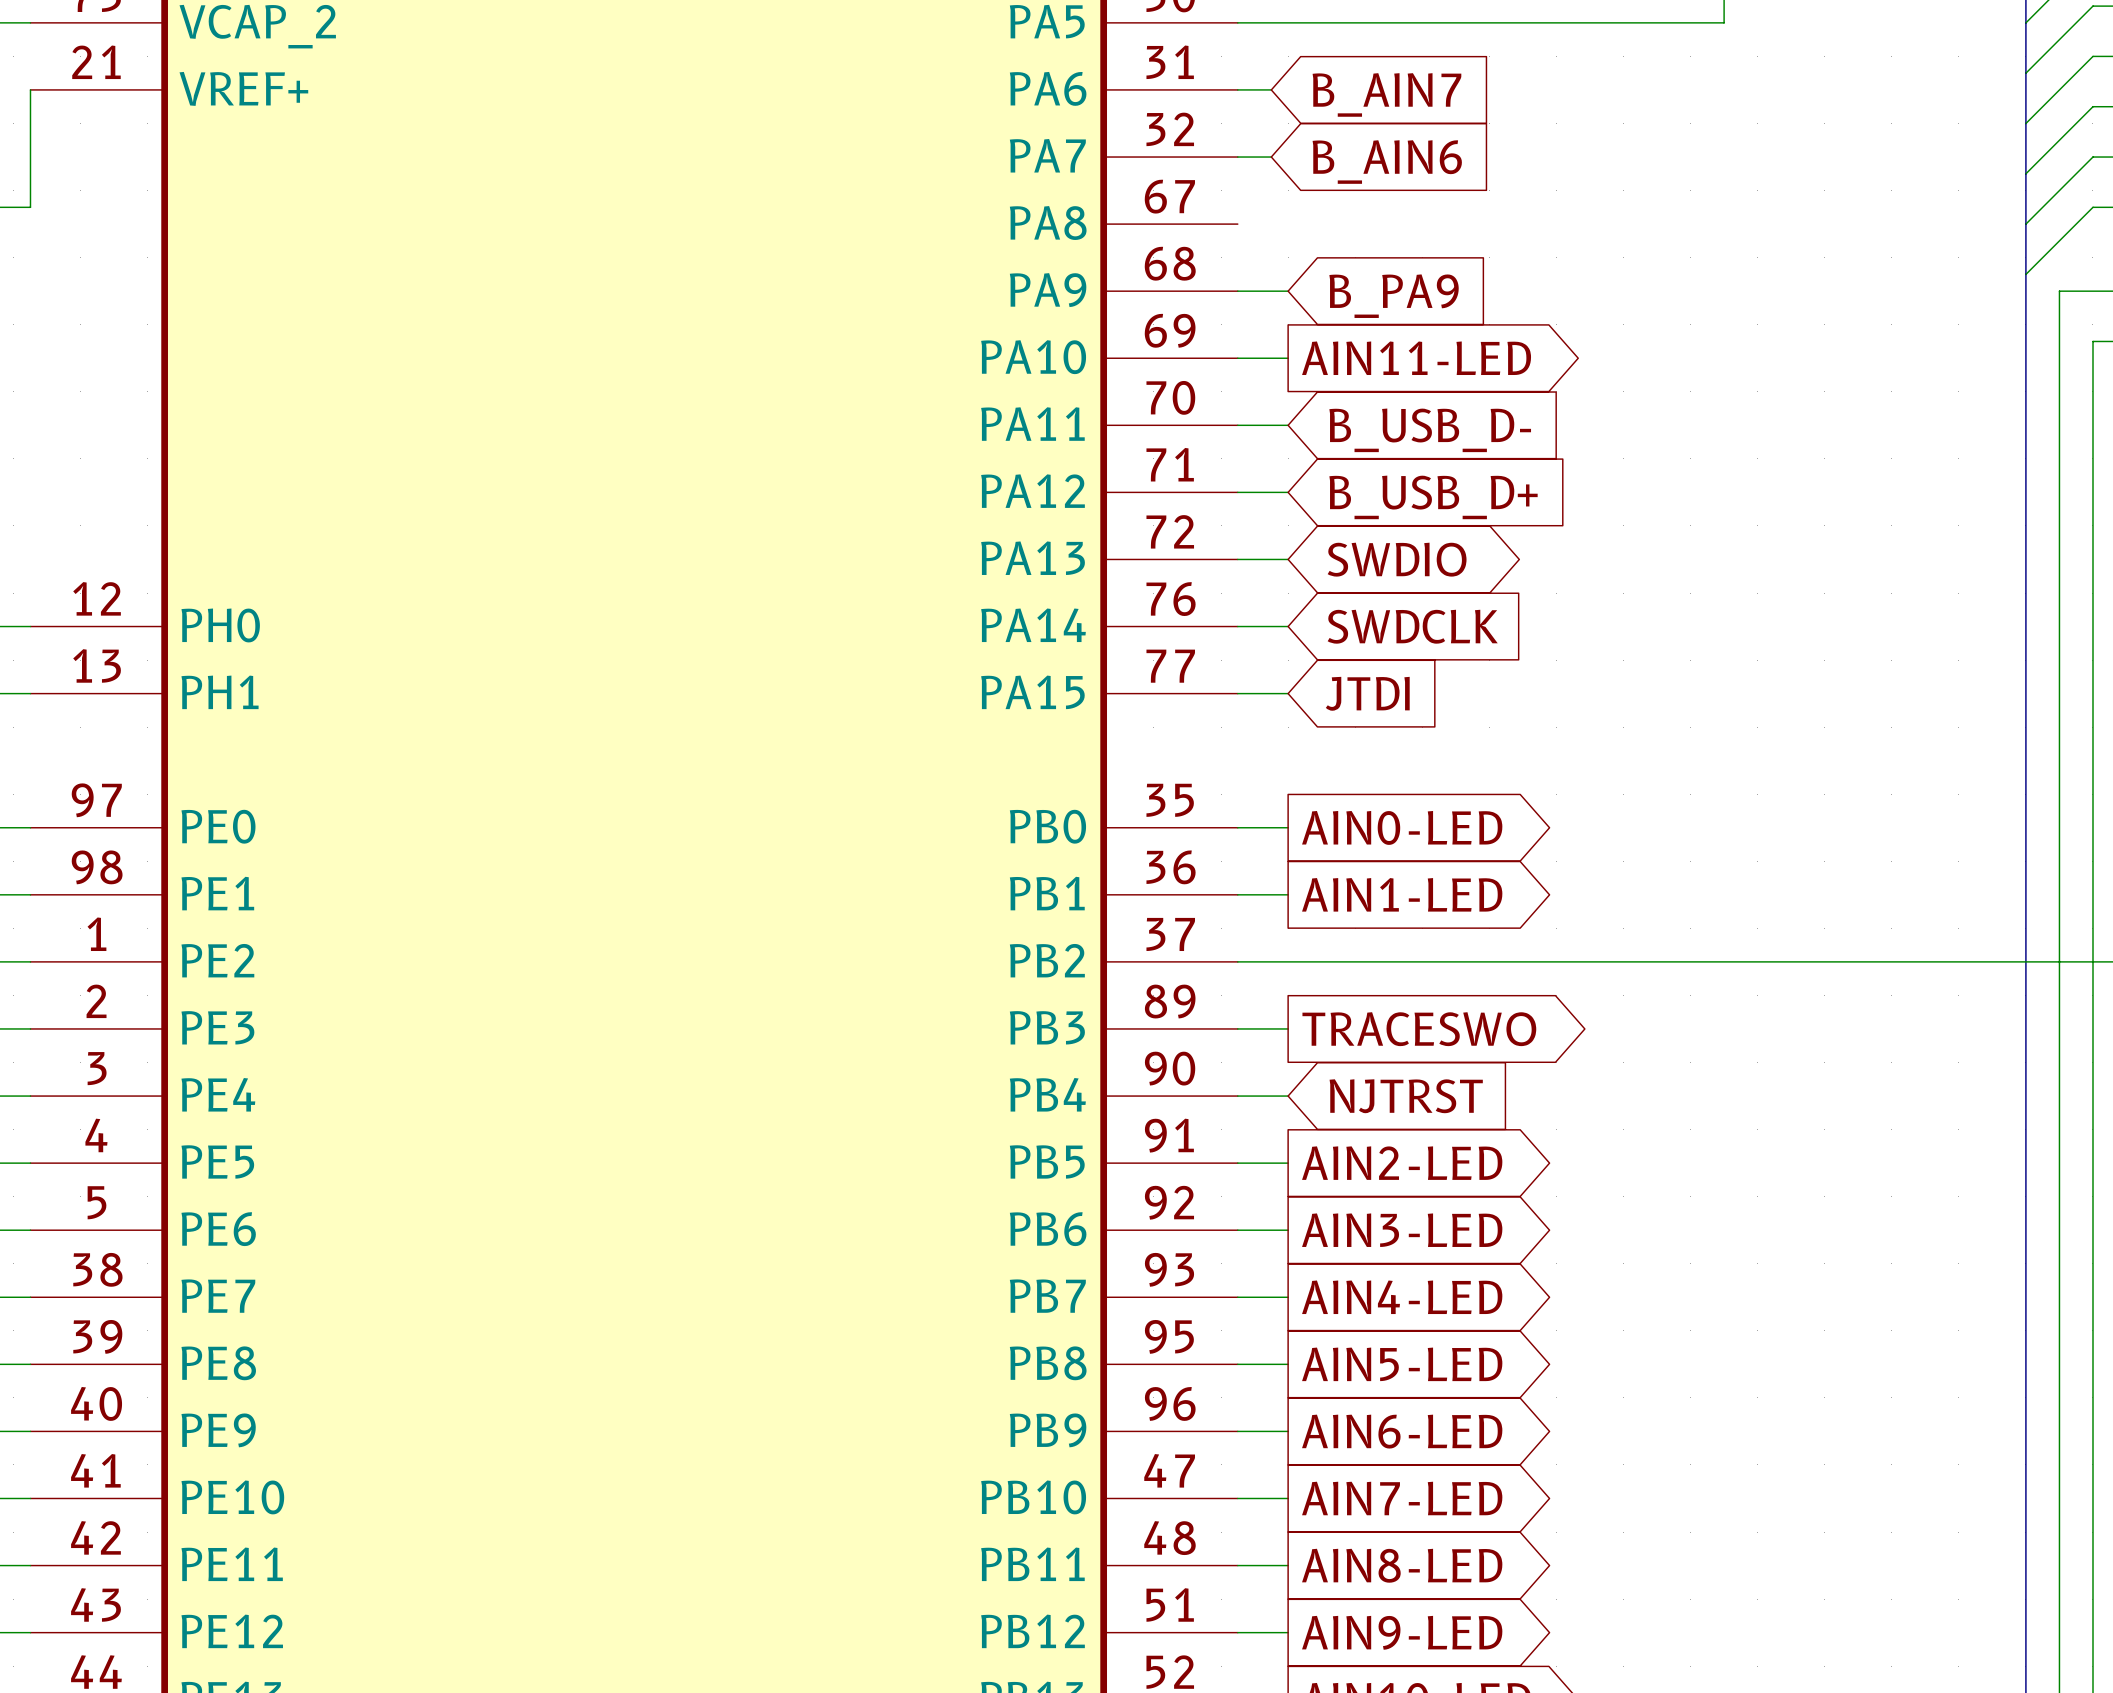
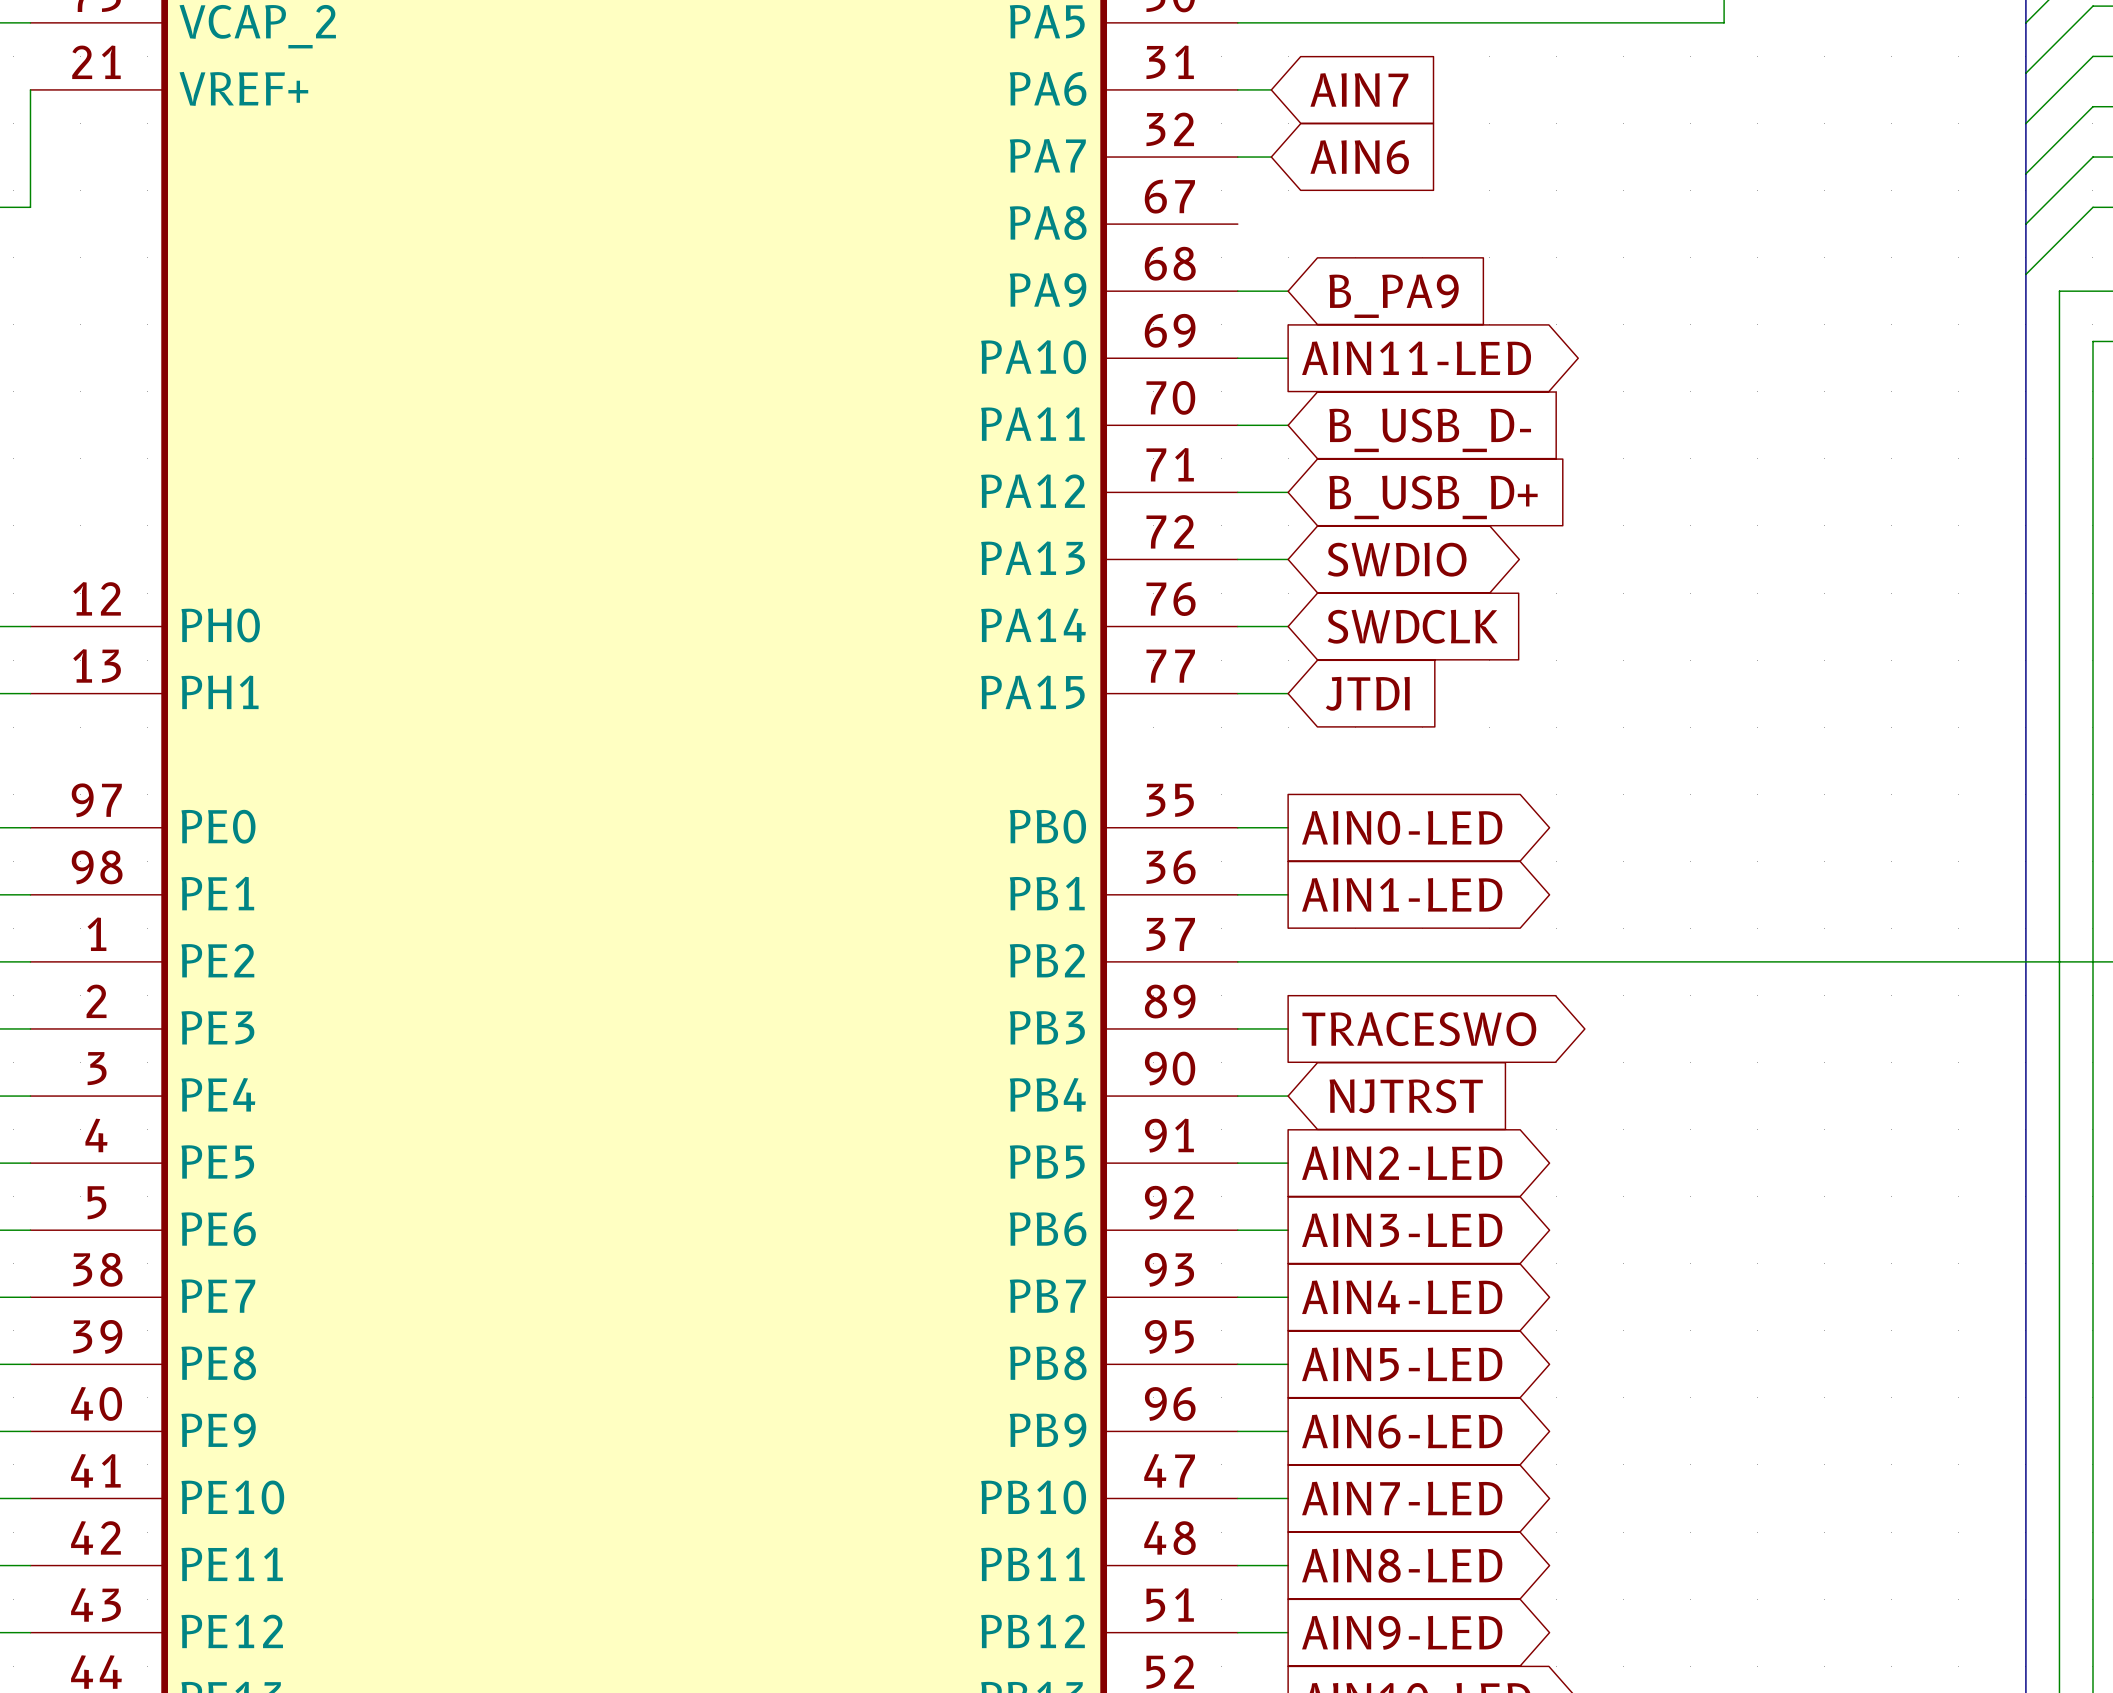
global label: B_AIN7 (1386, 94) -> AIN7 (1359, 89)
global label: B_AIN6 (1387, 162) -> AIN6 (1359, 157)

